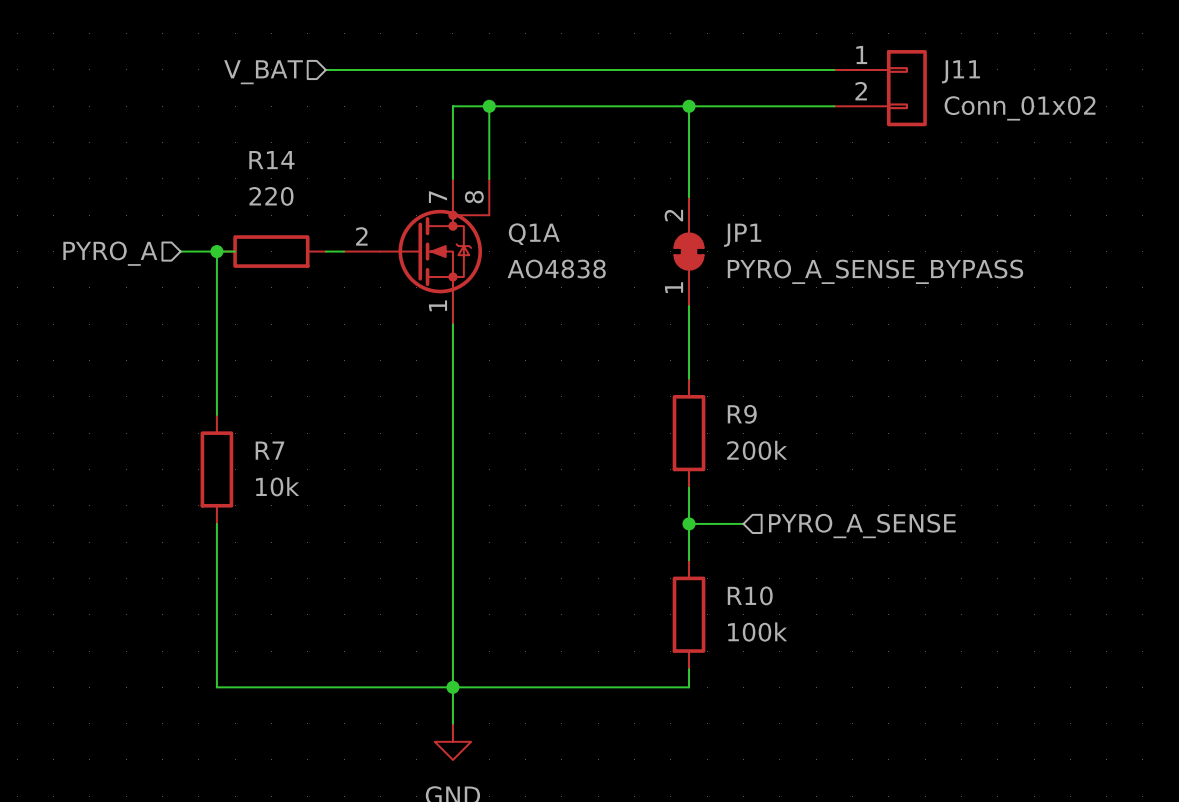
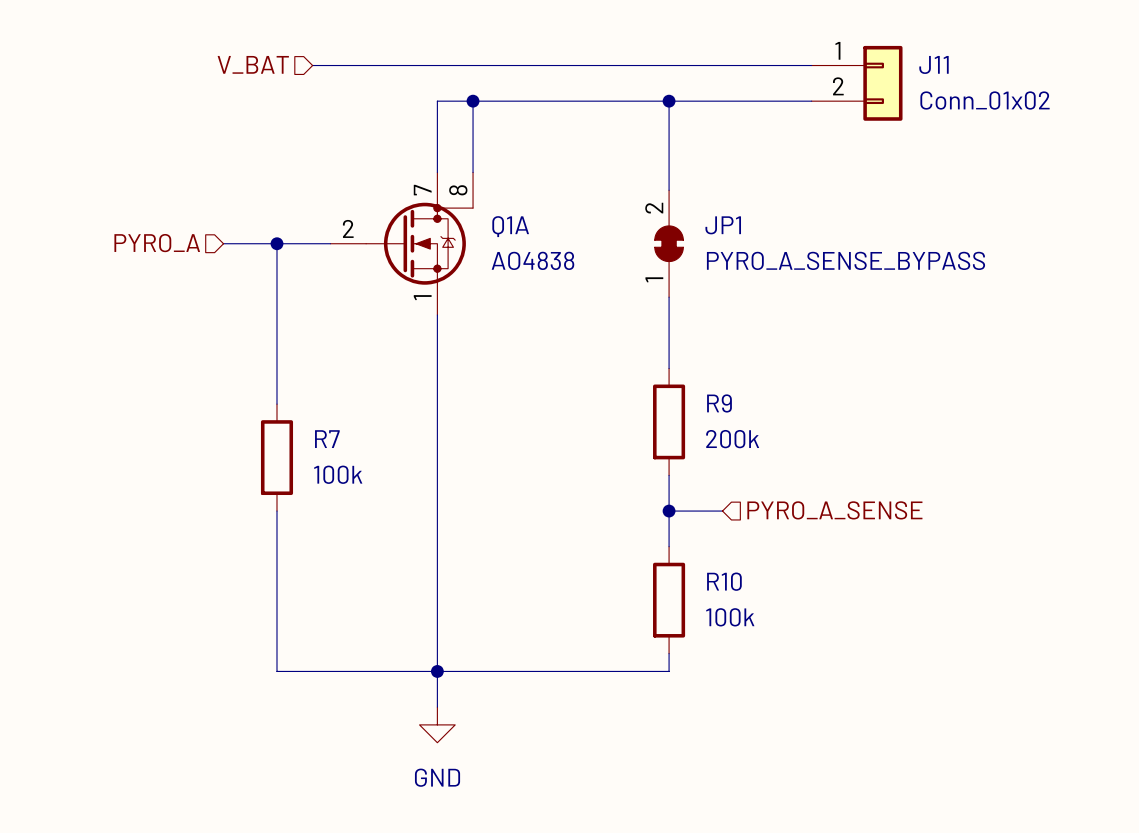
wire: (180, 251) (235, 251) -> (312, 243) (223, 243)
wire: (216, 251) (216, 414) -> (276, 243) (276, 404)
junction position: (216, 251) -> (276, 243)
R14: 220 (271, 251) -> none
hierarchical label position: PYRO_A (110, 253) -> PYRO_A (157, 243)
R7 position: (216, 469) -> (276, 457)
R7 value: 10k (277, 486) -> 100k (338, 474)
wire: (216, 523) (216, 687) (289, 687) -> (276, 511) (276, 671)

